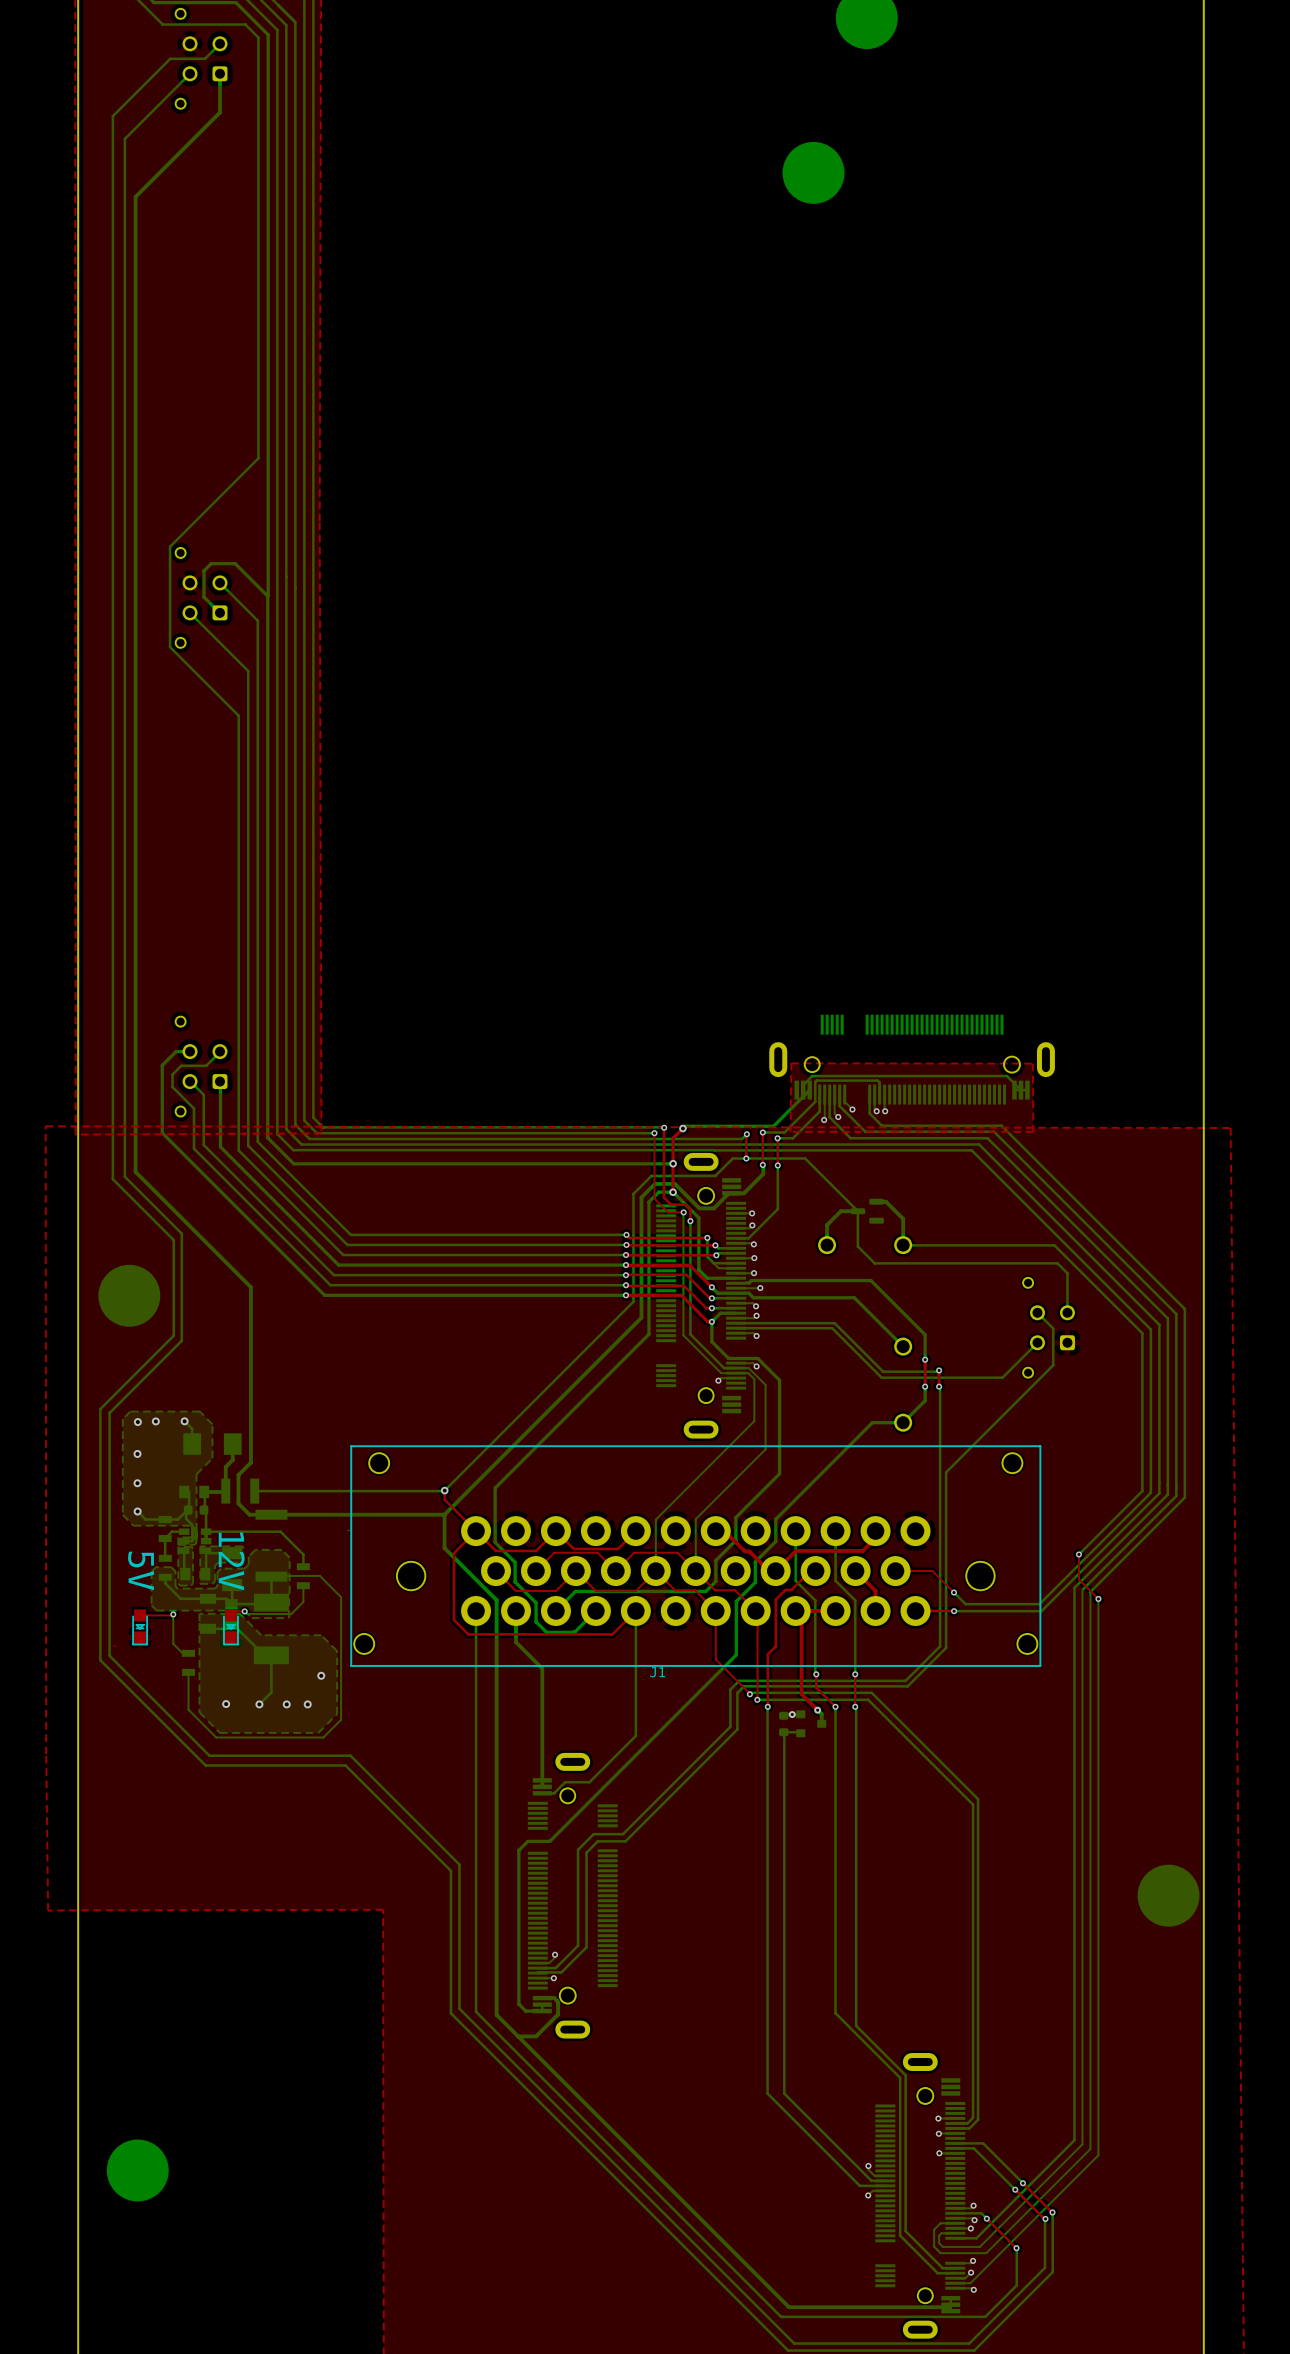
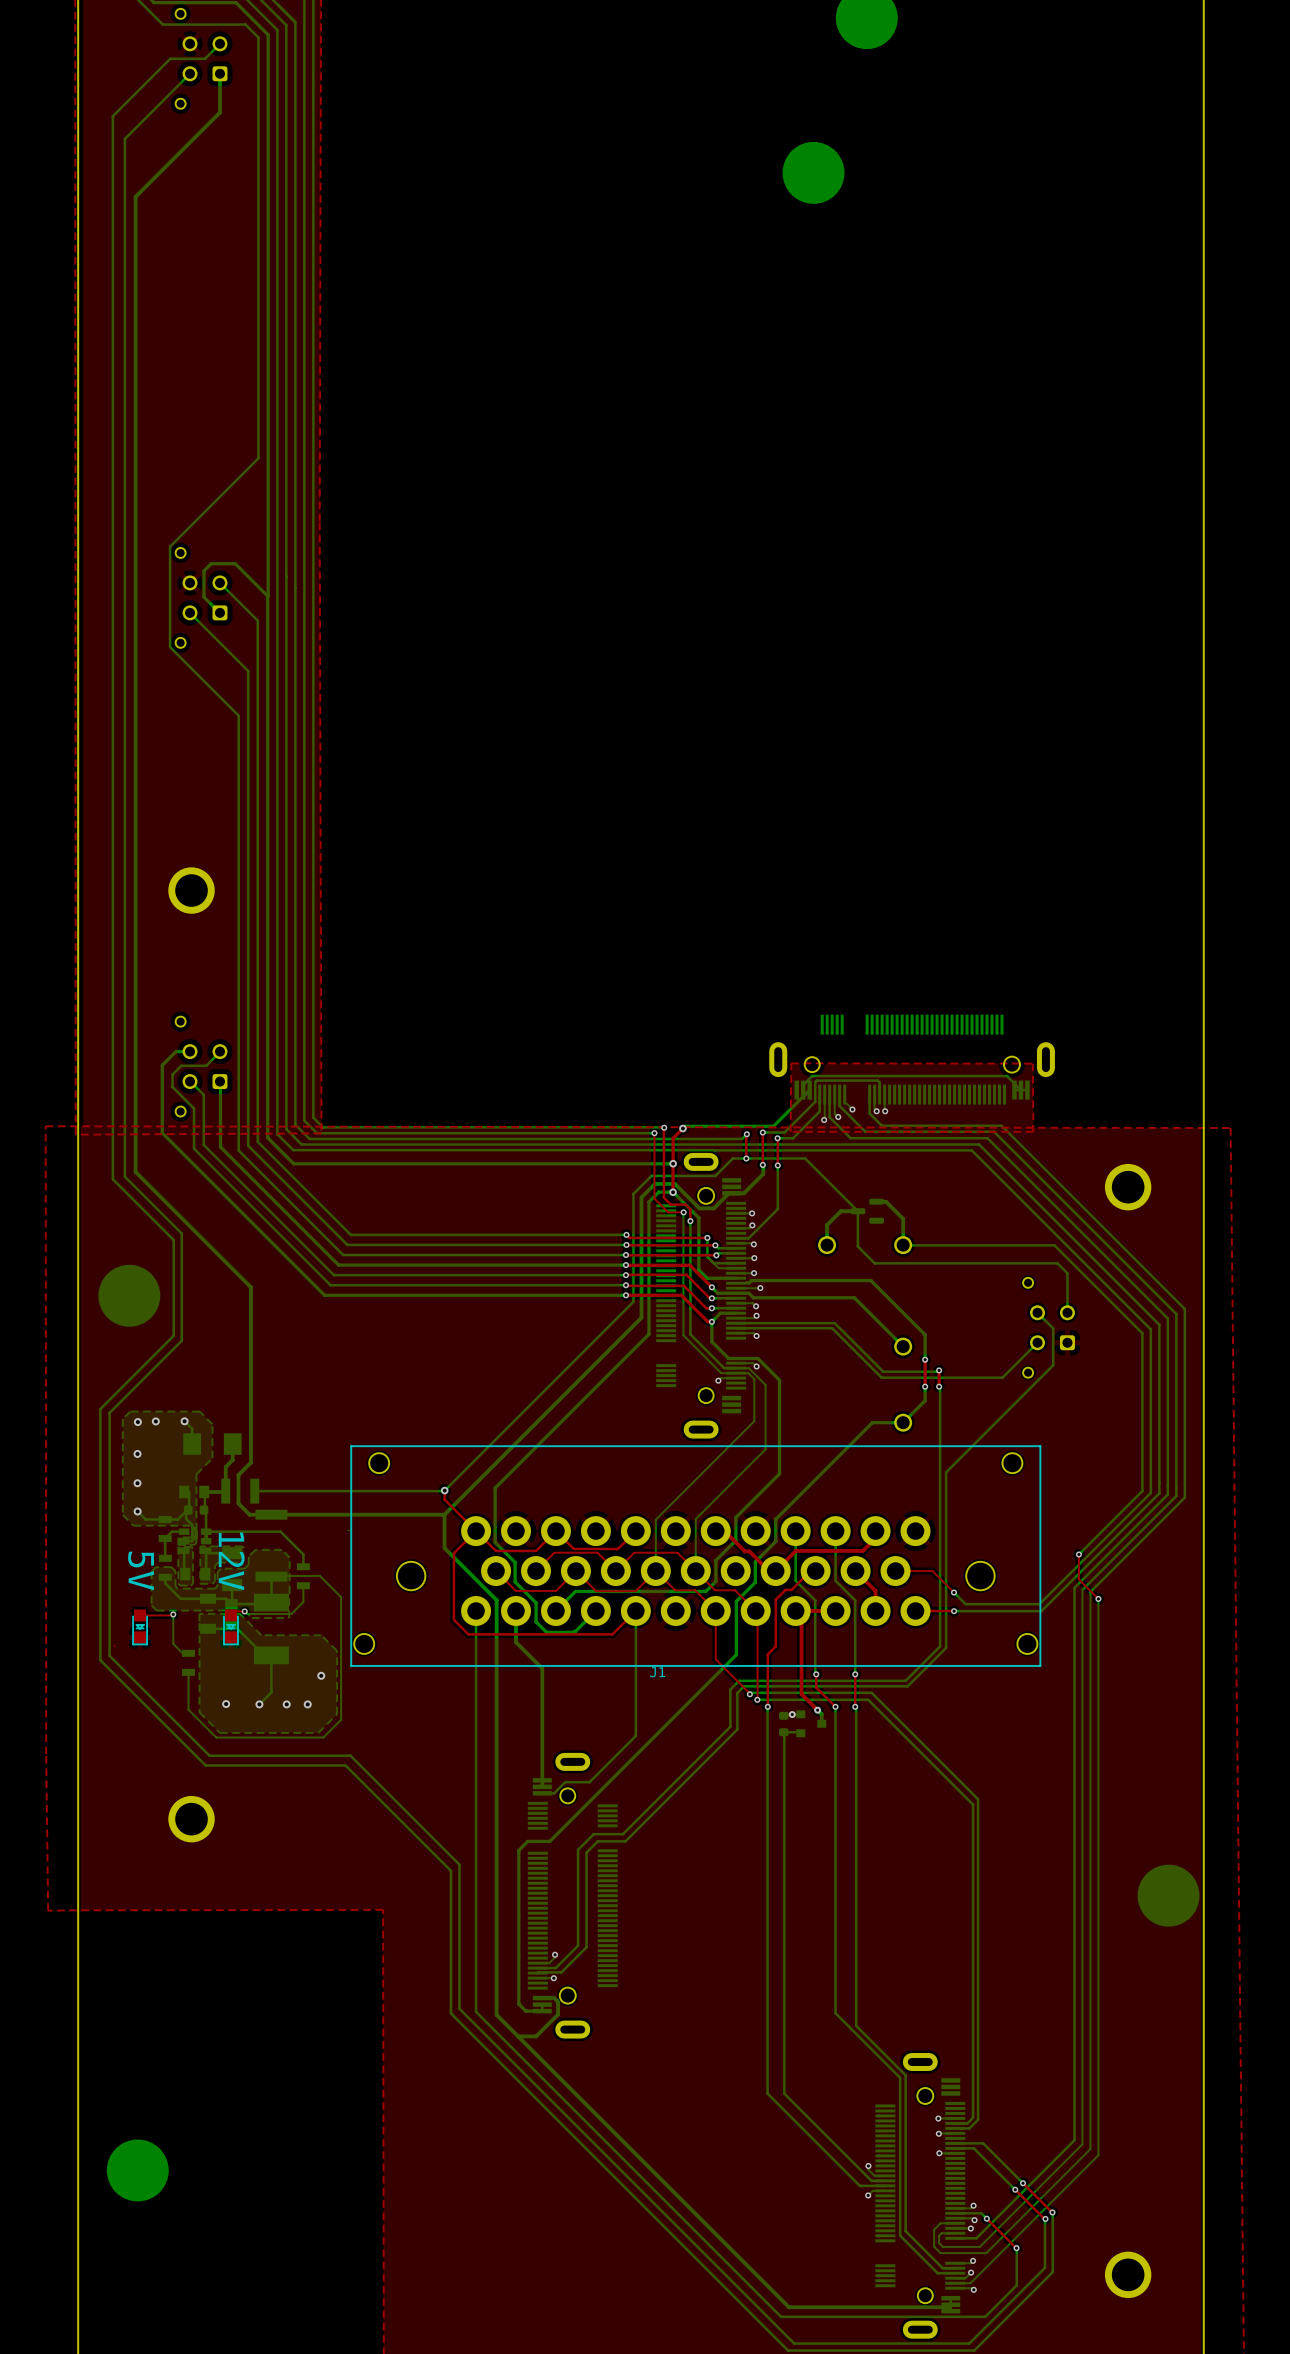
part: none -> (191, 890)
part: none -> (1128, 1187)
part: none -> (191, 1819)
part: none -> (1128, 2274)

